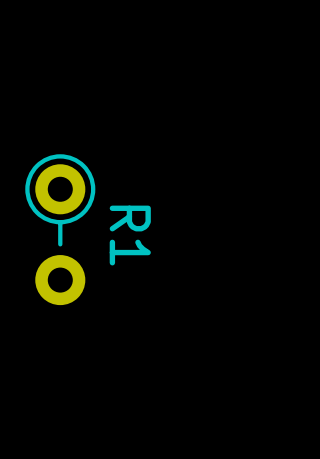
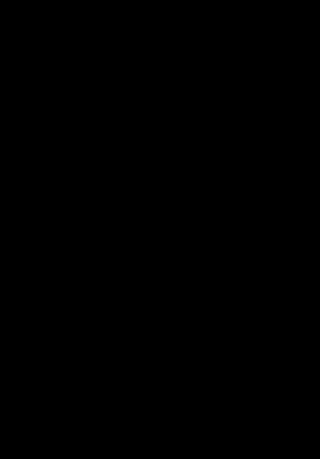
R1: (60, 229) -> none

